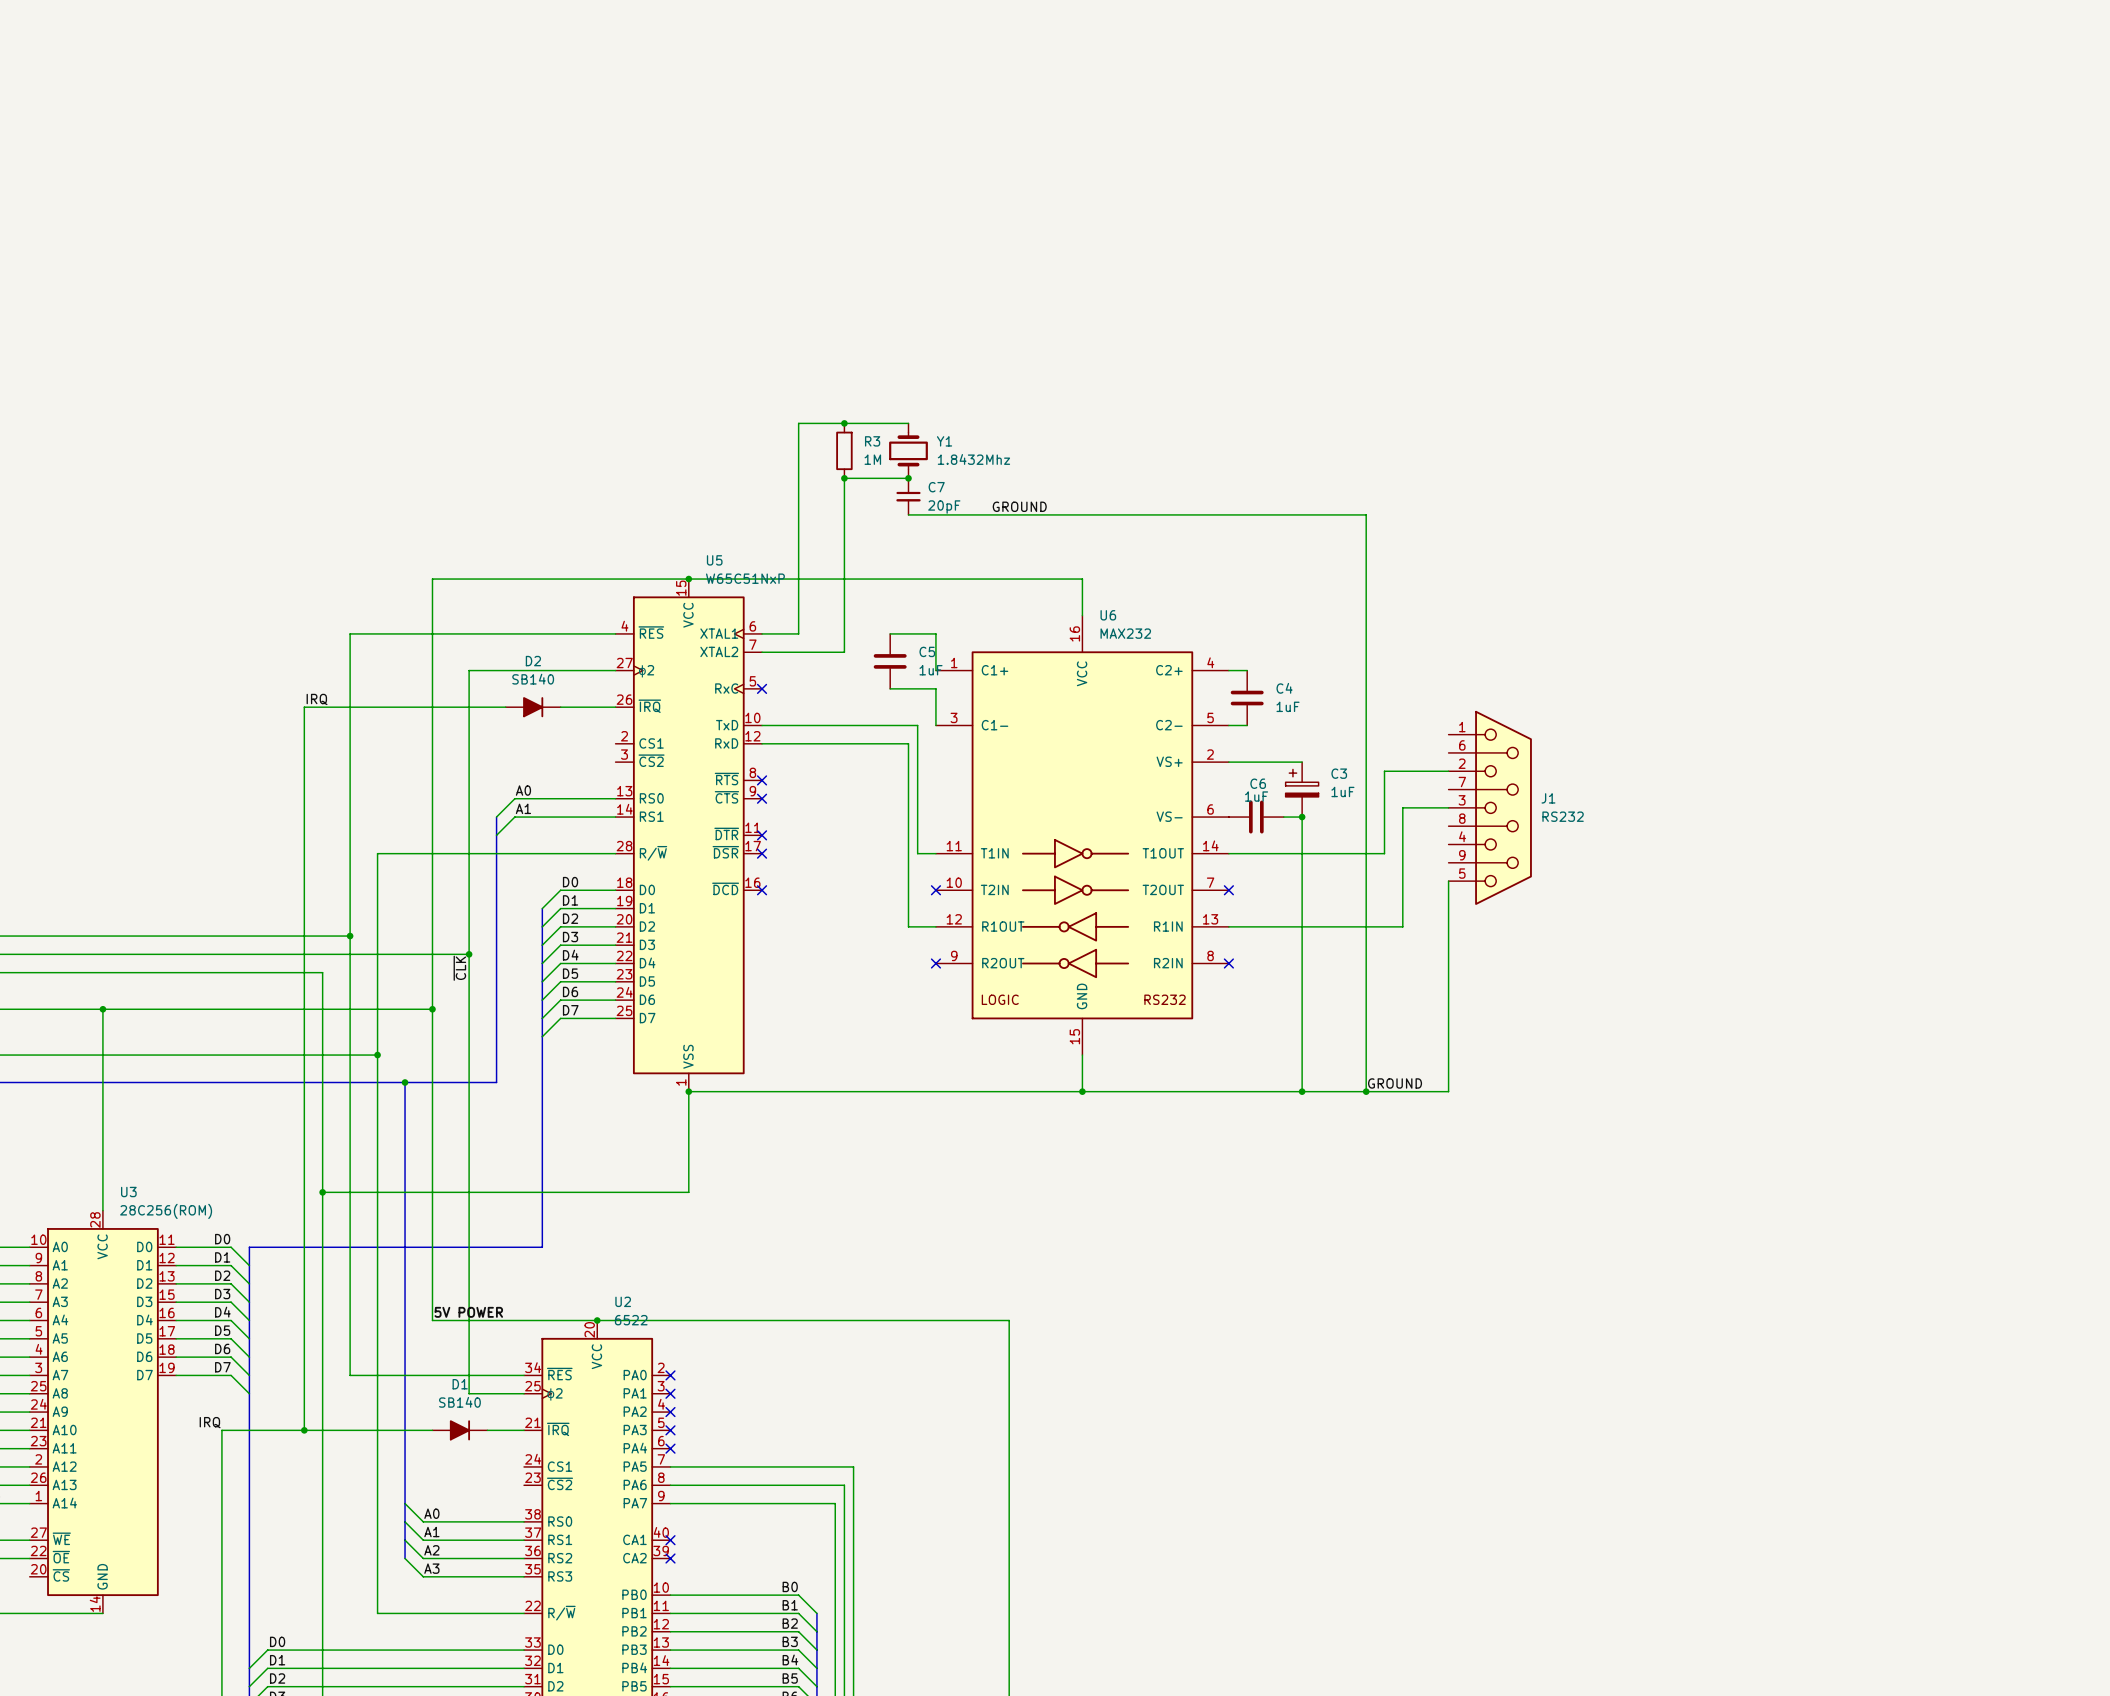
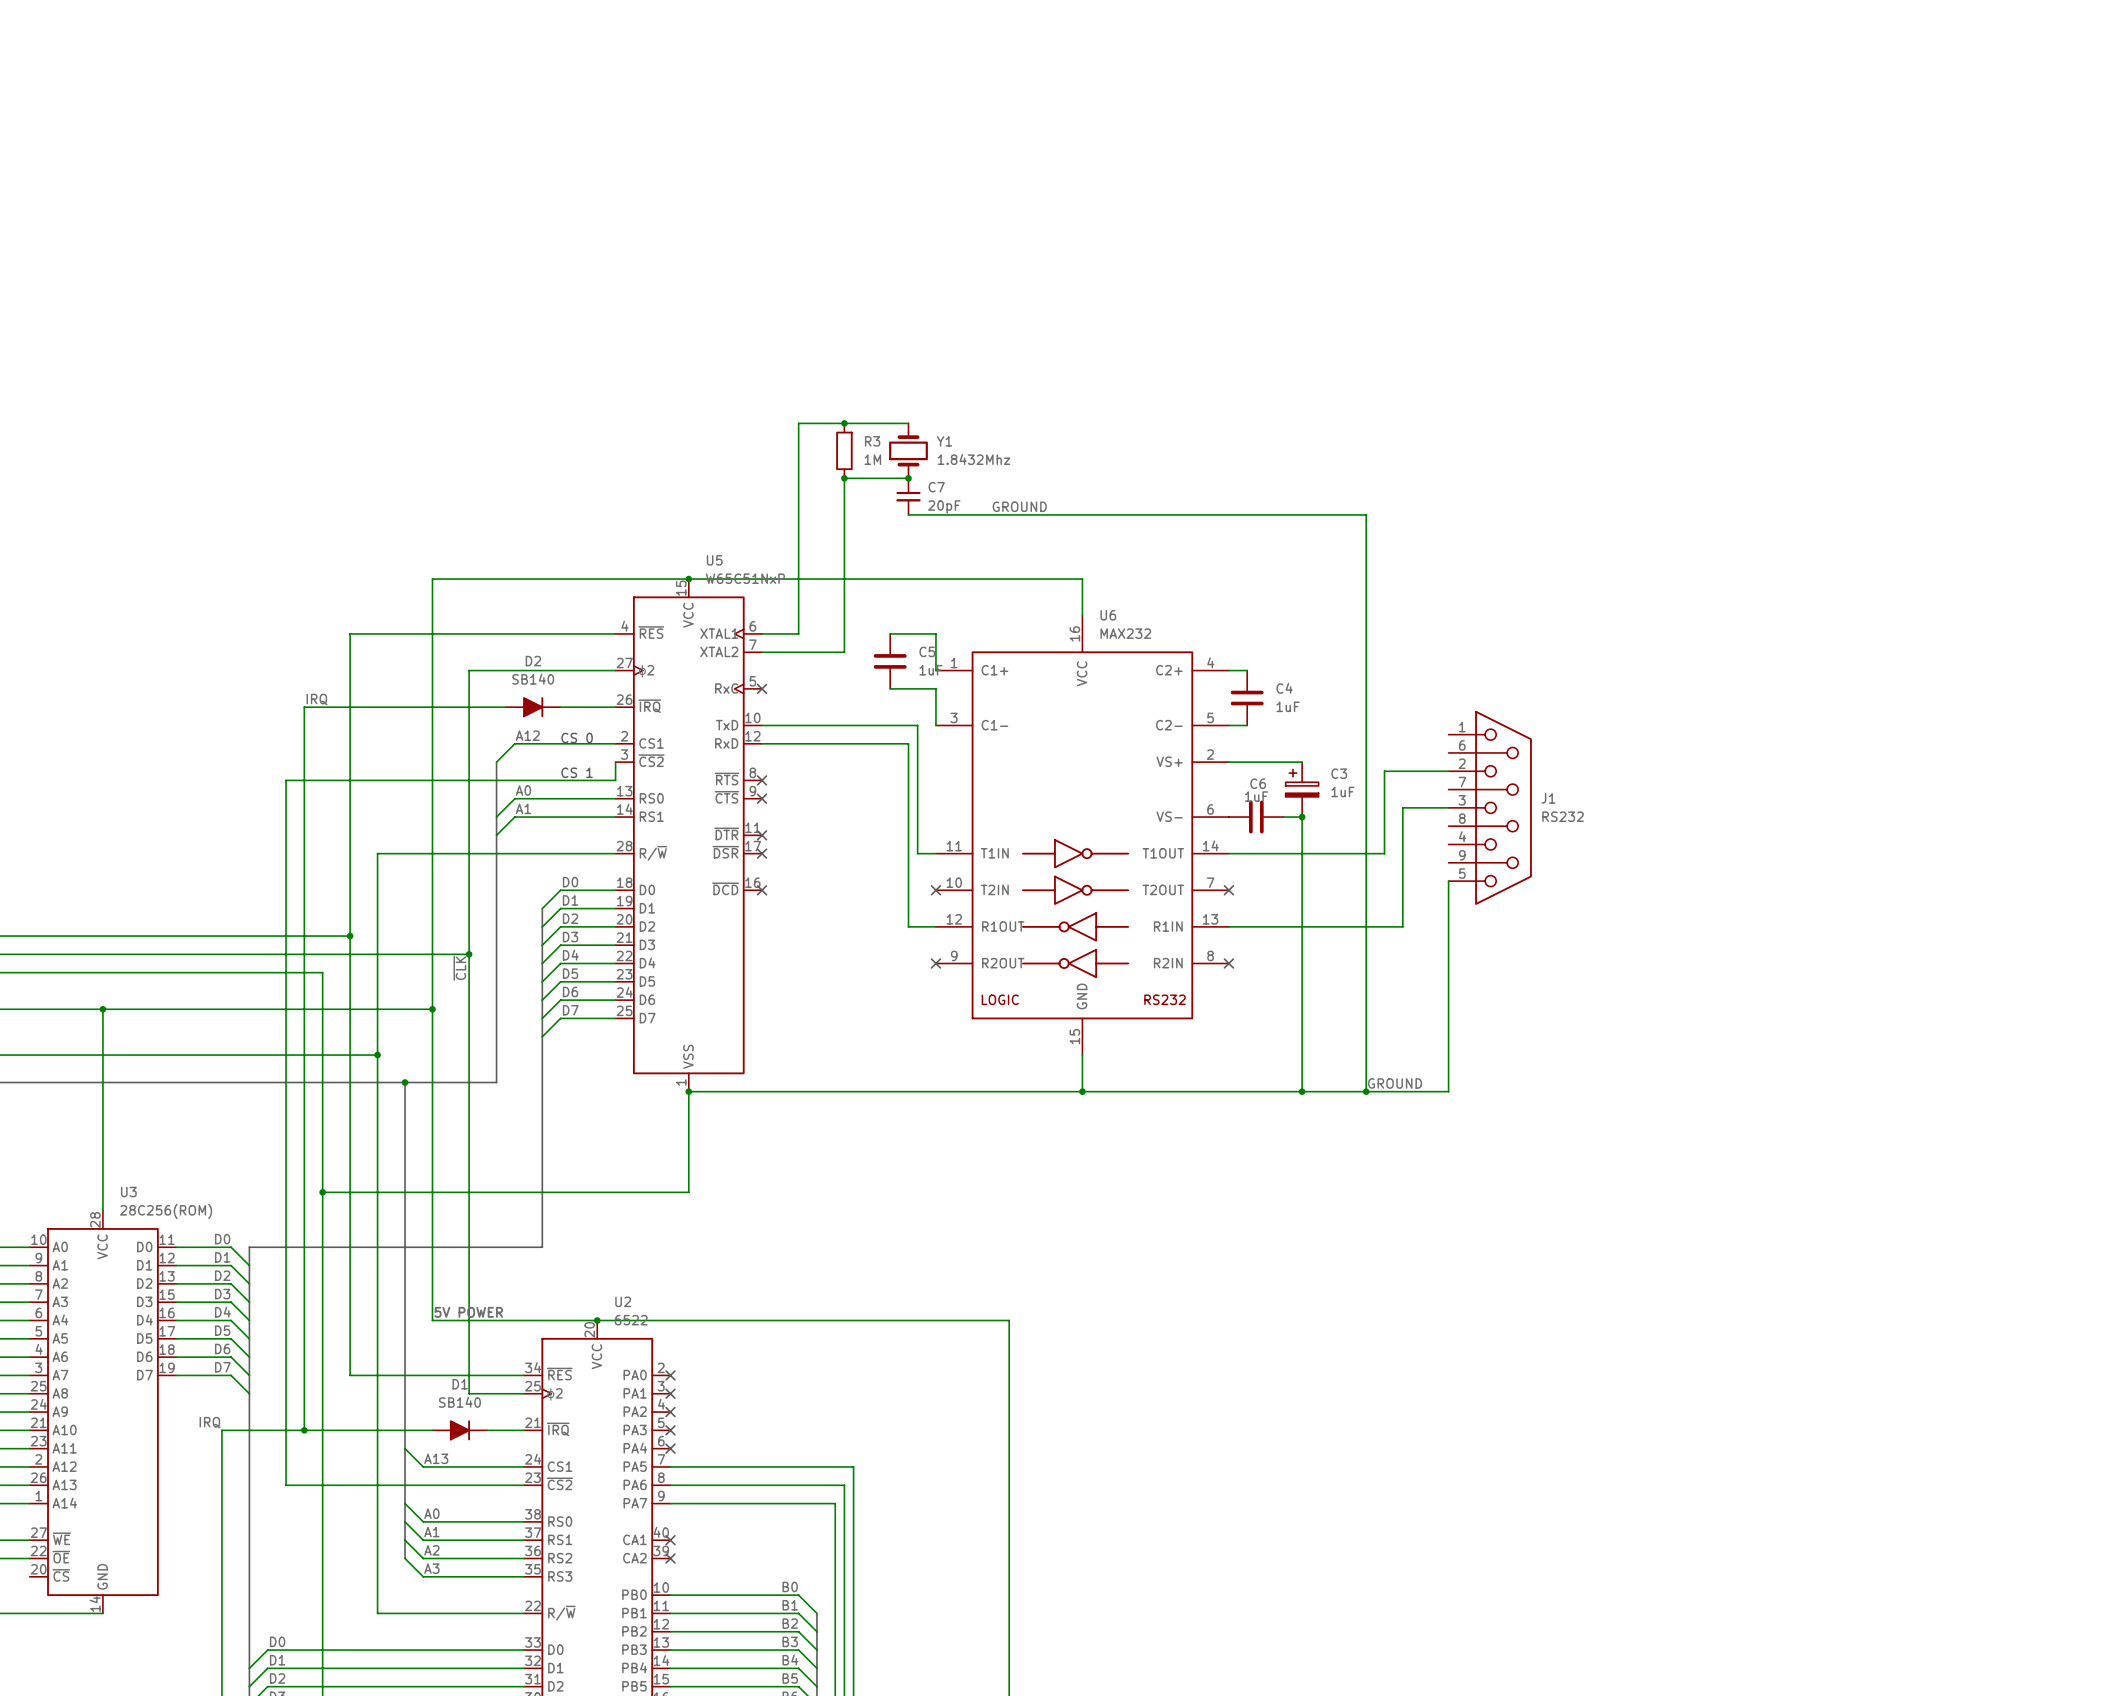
label: none -> A12 (527, 735)
text: none -> CS 0 (577, 737)
wire: none -> (615, 743) (514, 743) (496, 762)
bus: none -> (496, 762) (496, 817)
wire: none -> (615, 762) (615, 780) (286, 780) (286, 1485) (524, 1485)
text: none -> CS 1 (577, 772)
wire: none -> (405, 1448) (423, 1466) (524, 1466)
label: none -> A13 (436, 1458)

